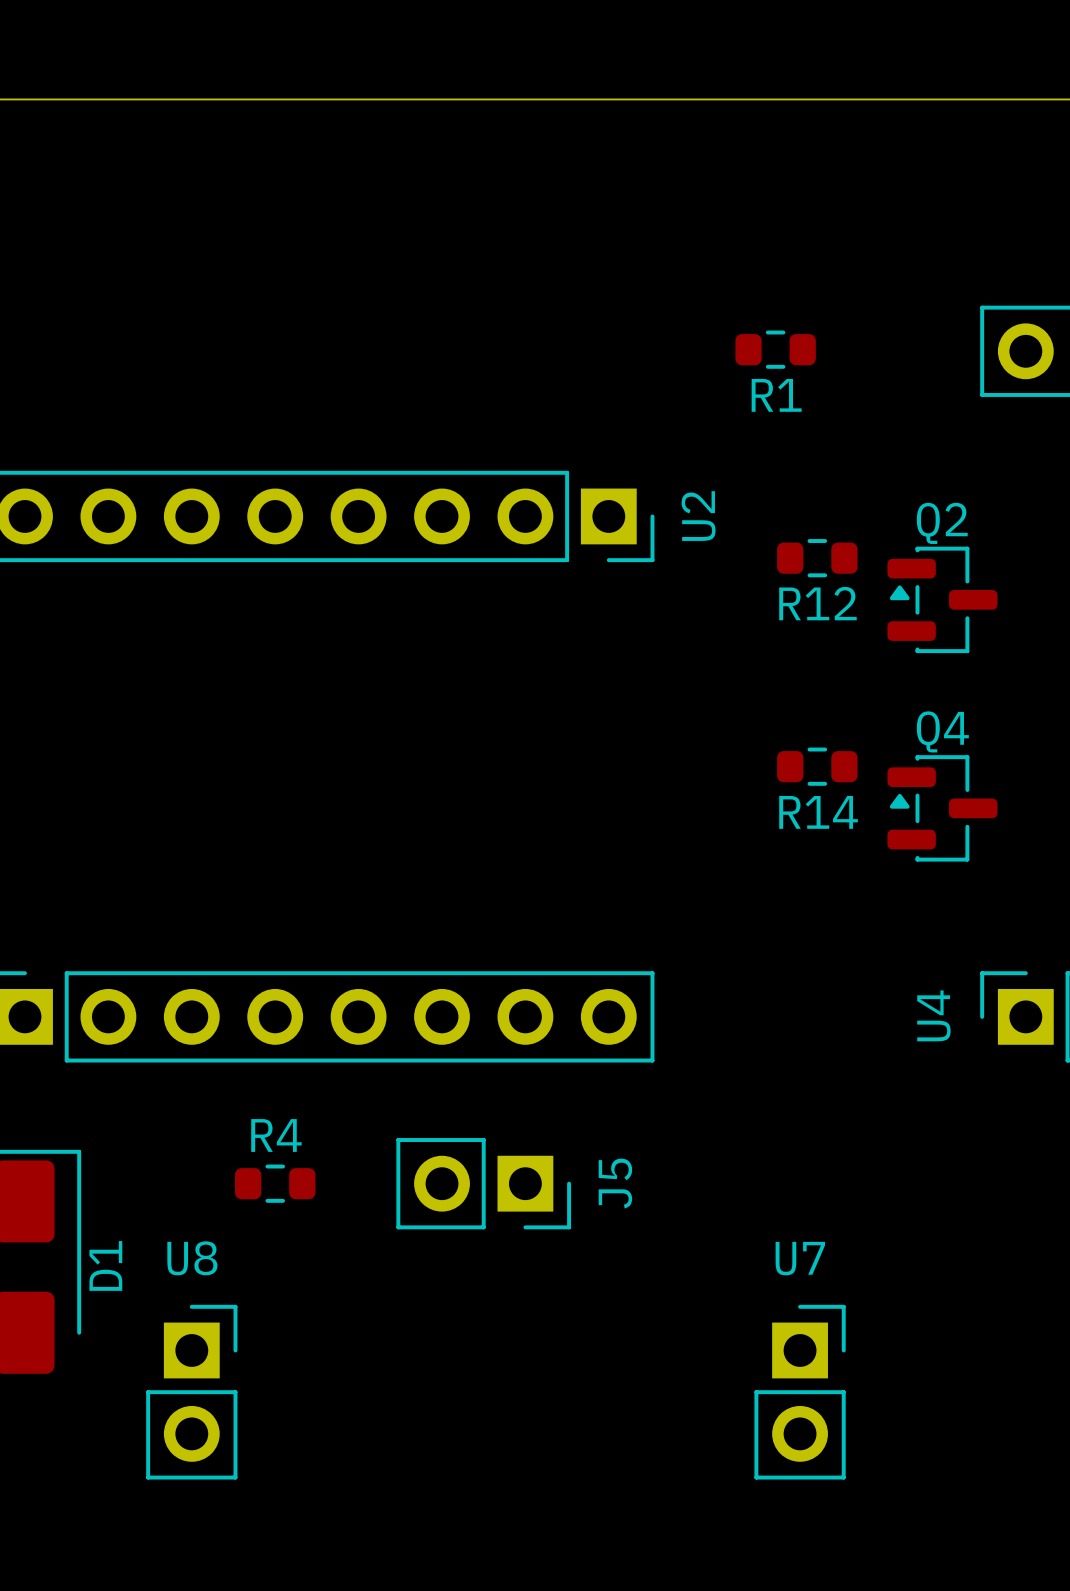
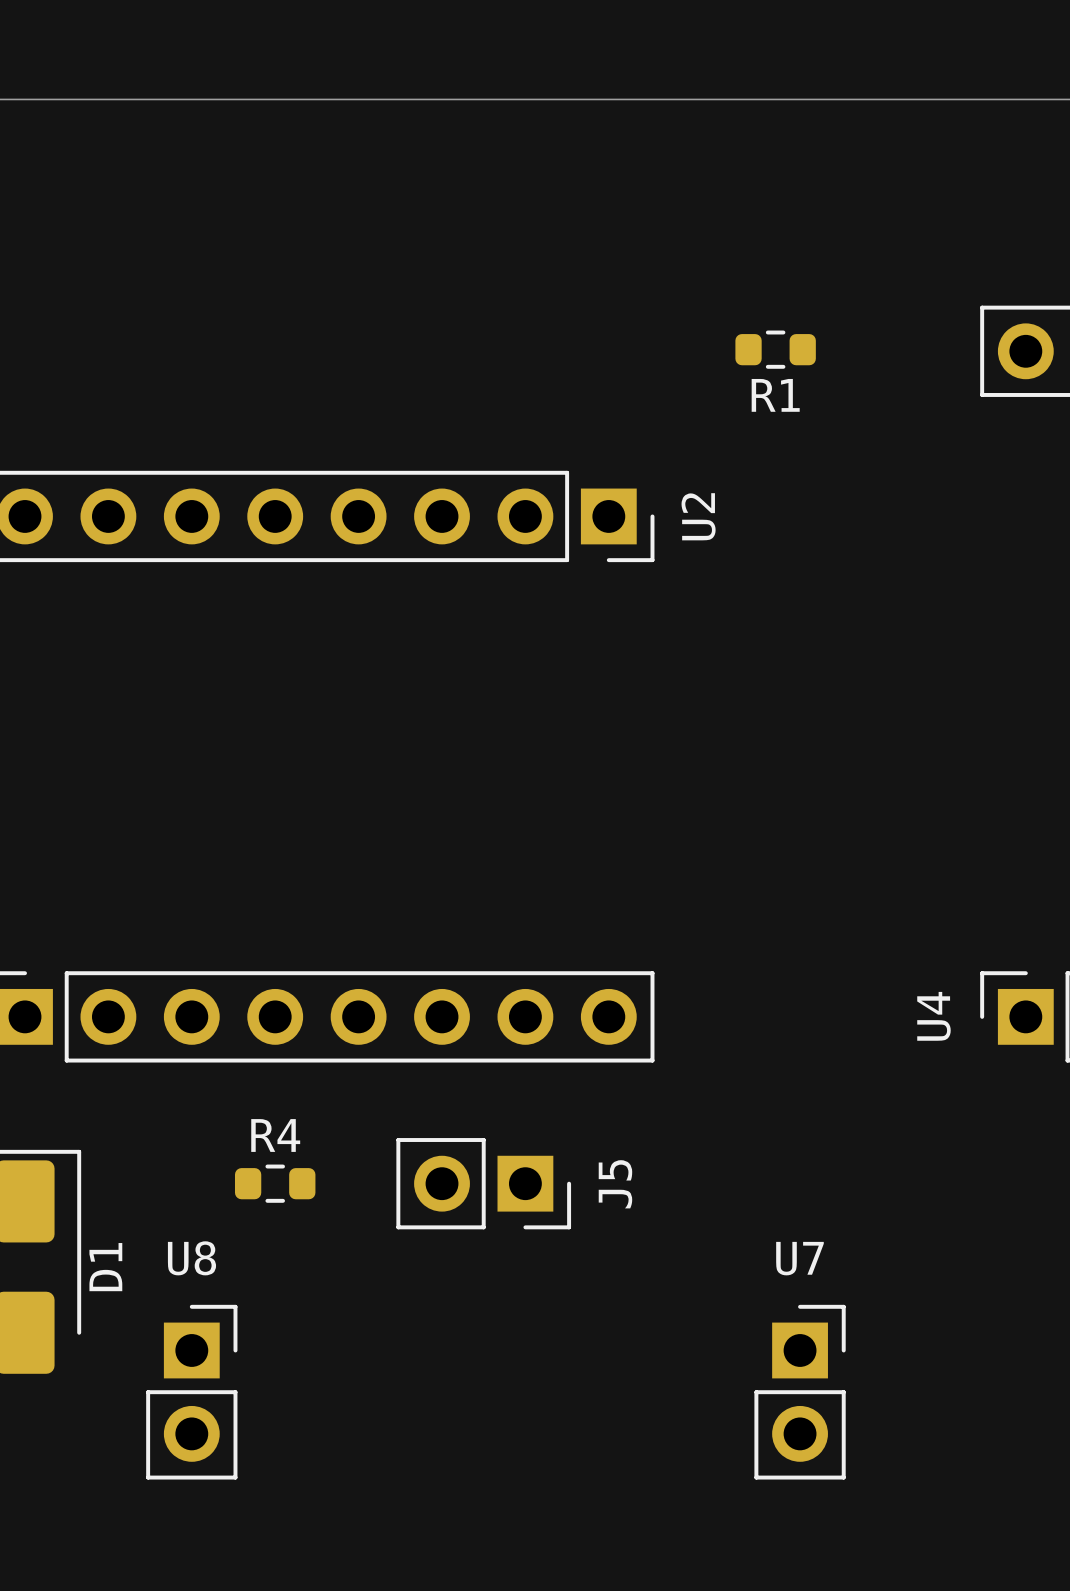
R12: (817, 558) -> none
Q2: (942, 599) -> none
R14: (817, 766) -> none
Q4: (942, 808) -> none

